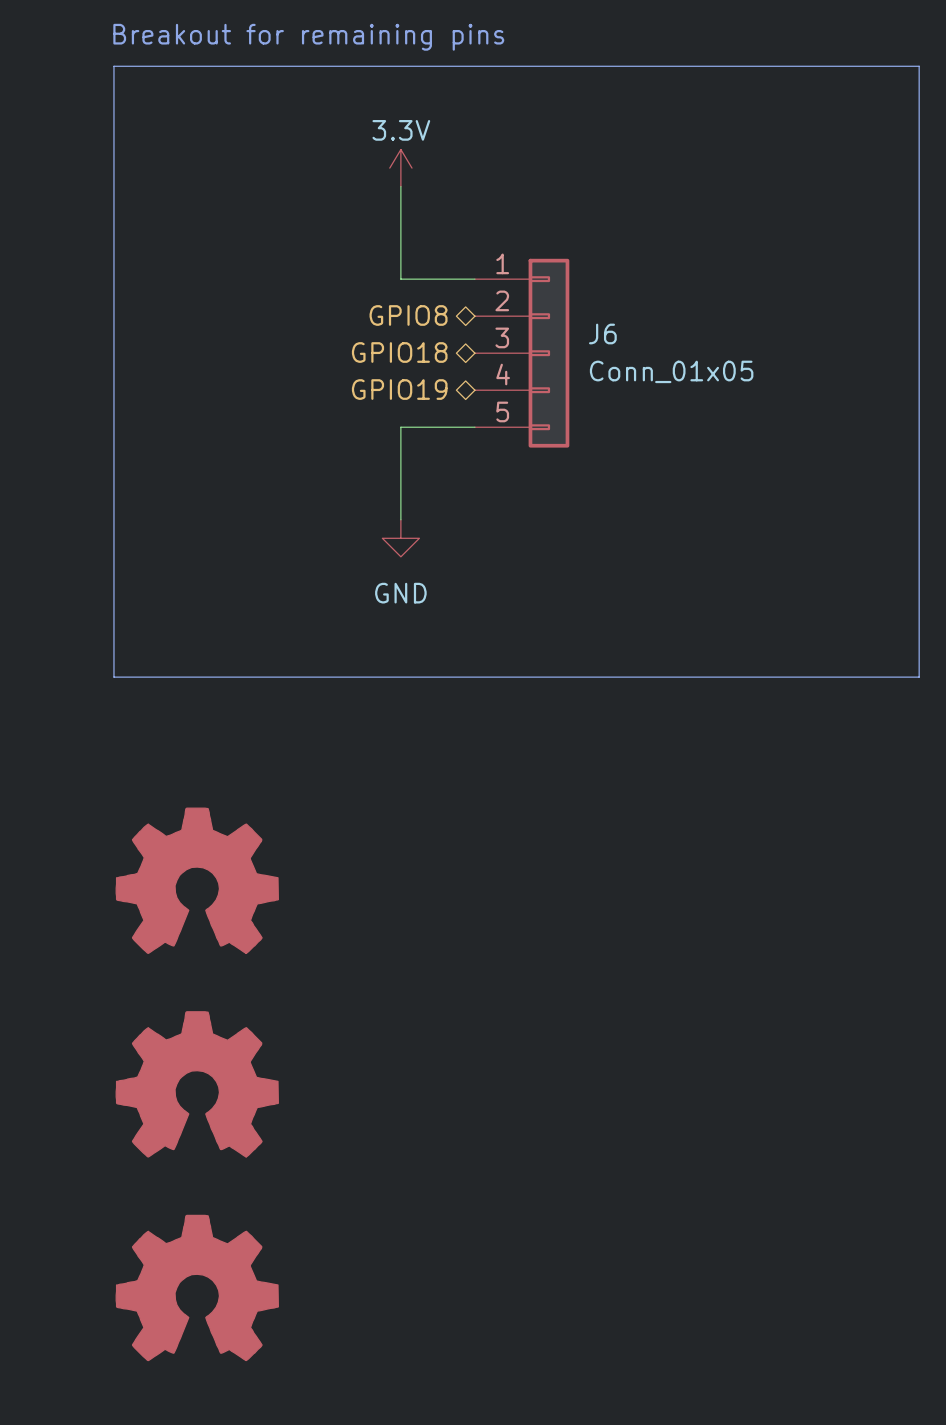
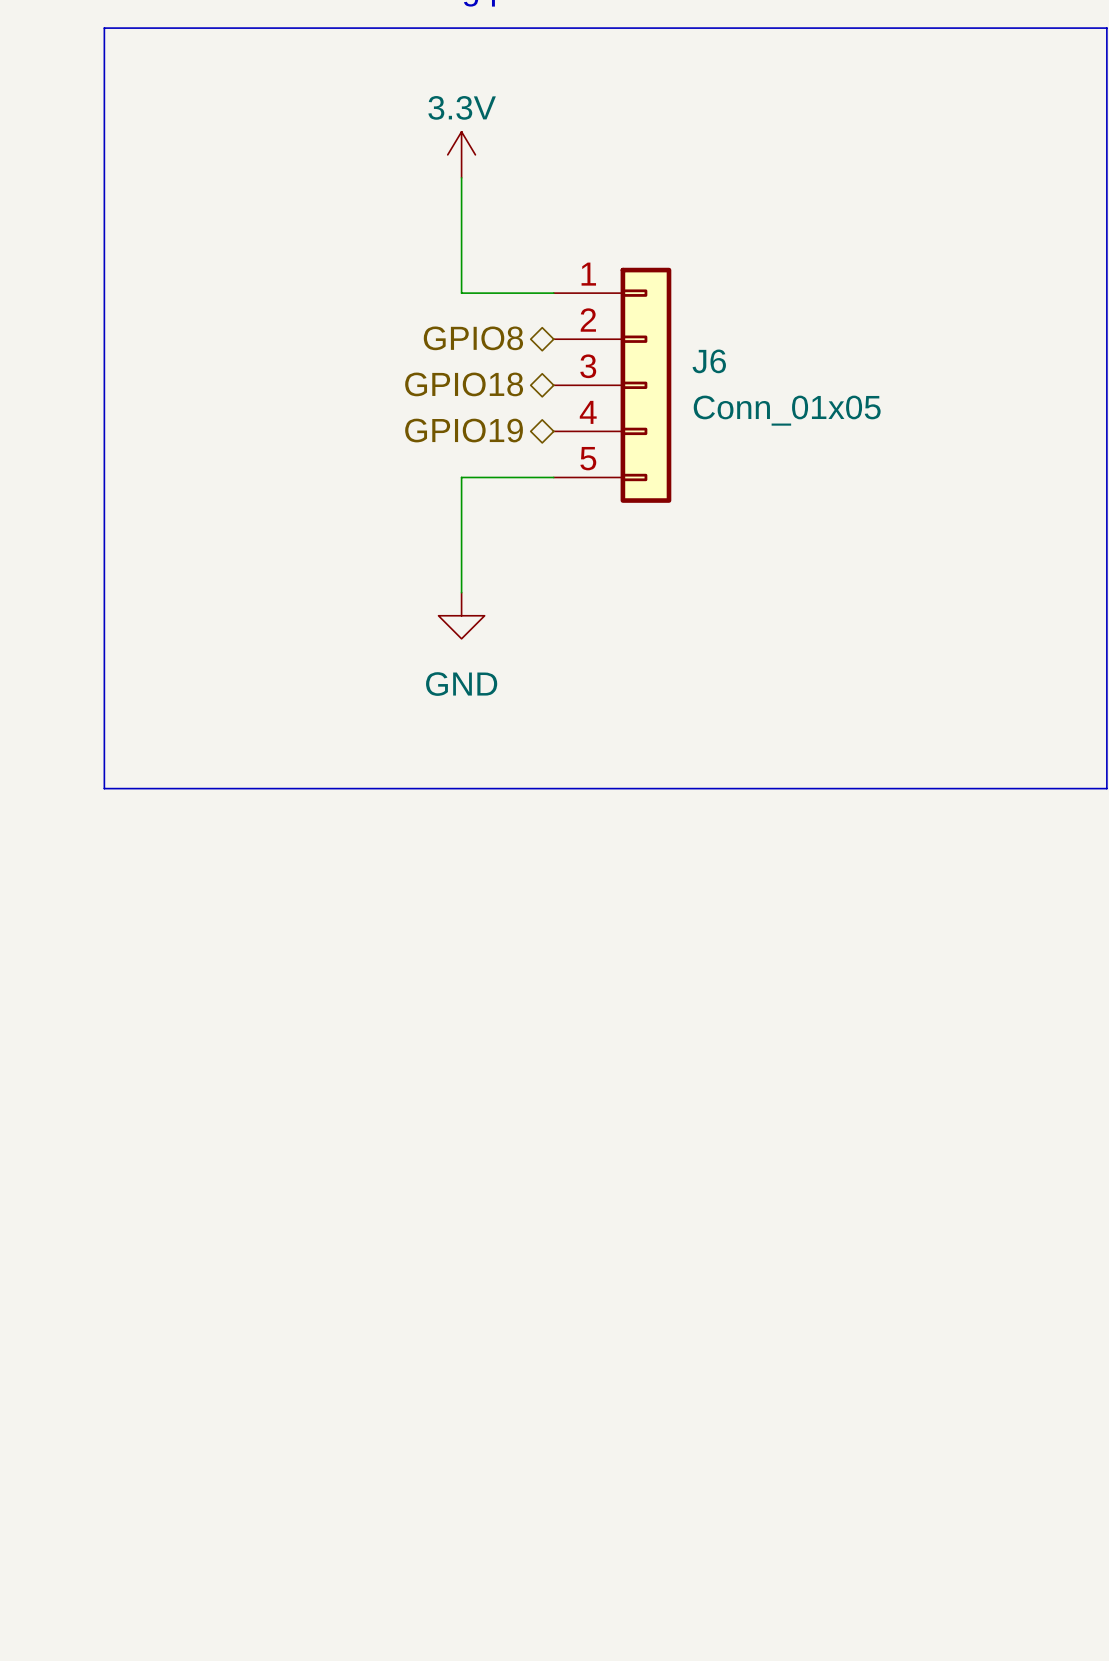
power symbol: (197, 880) -> none
power symbol: (197, 1084) -> none
power symbol: (197, 1287) -> none

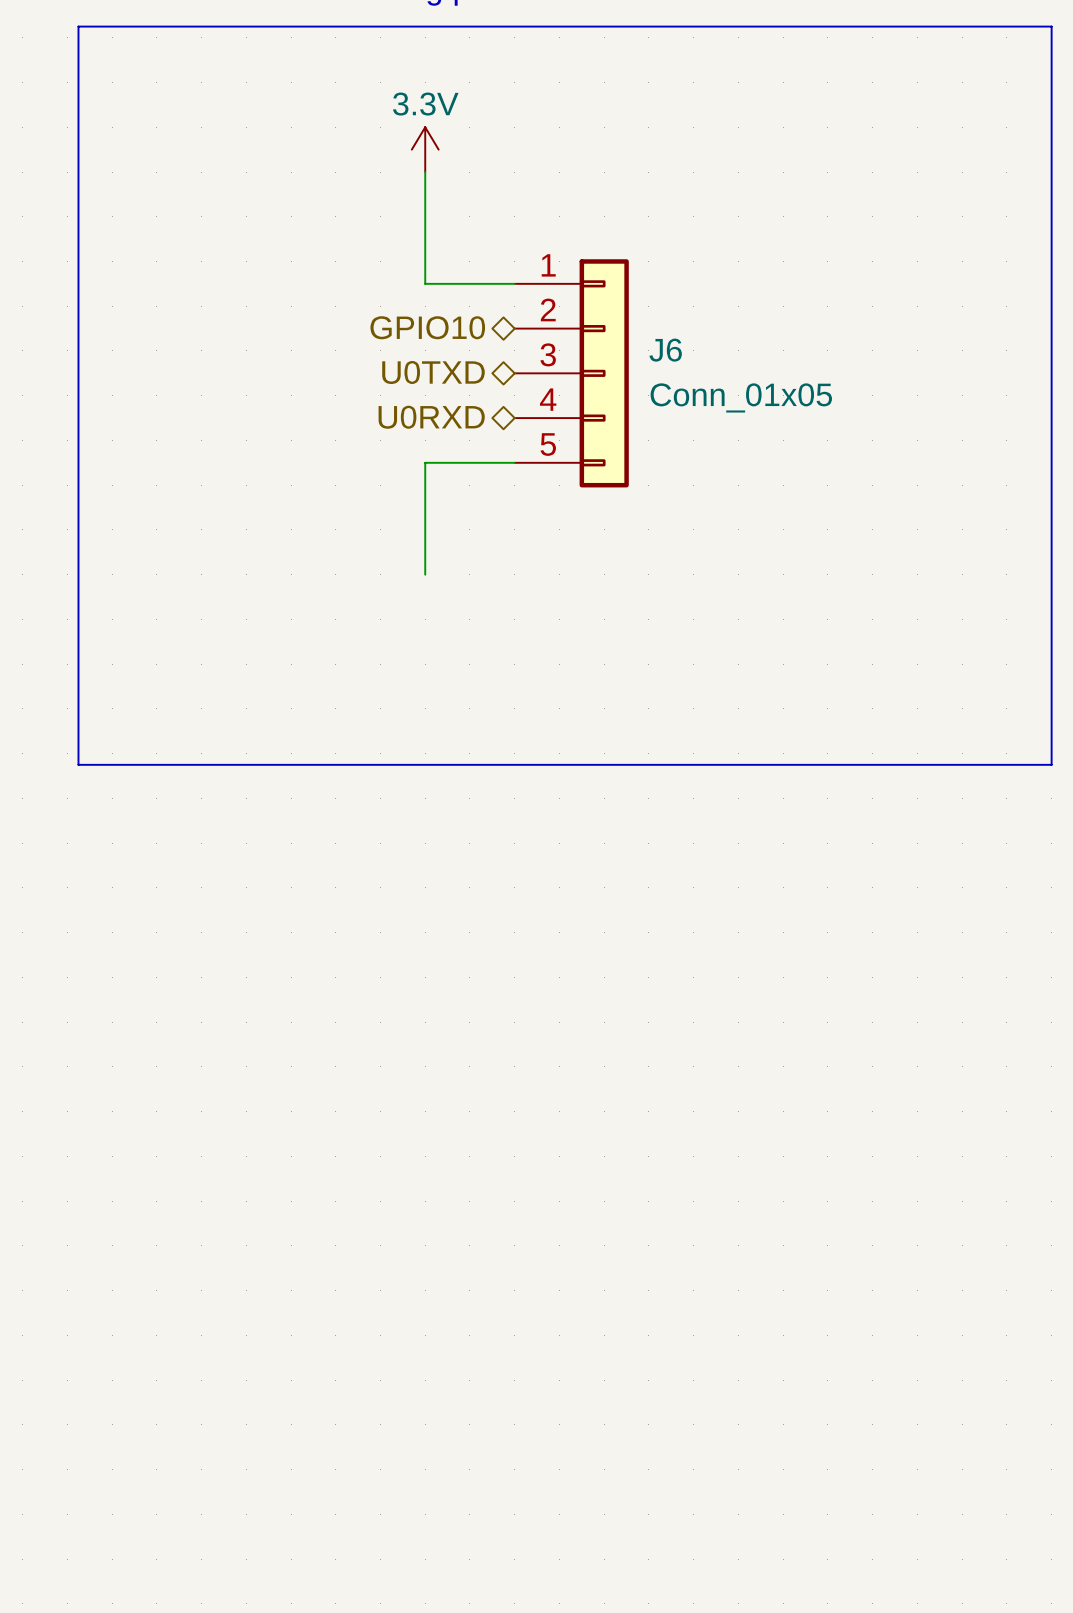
hierarchical label: GPIO8 (473, 338) -> GPIO10 (427, 327)
hierarchical label: GPIO18 (464, 384) -> U0TXD (433, 372)
hierarchical label: GPIO19 (464, 430) -> U0RXD (431, 417)
power symbol: GND (461, 615) -> none

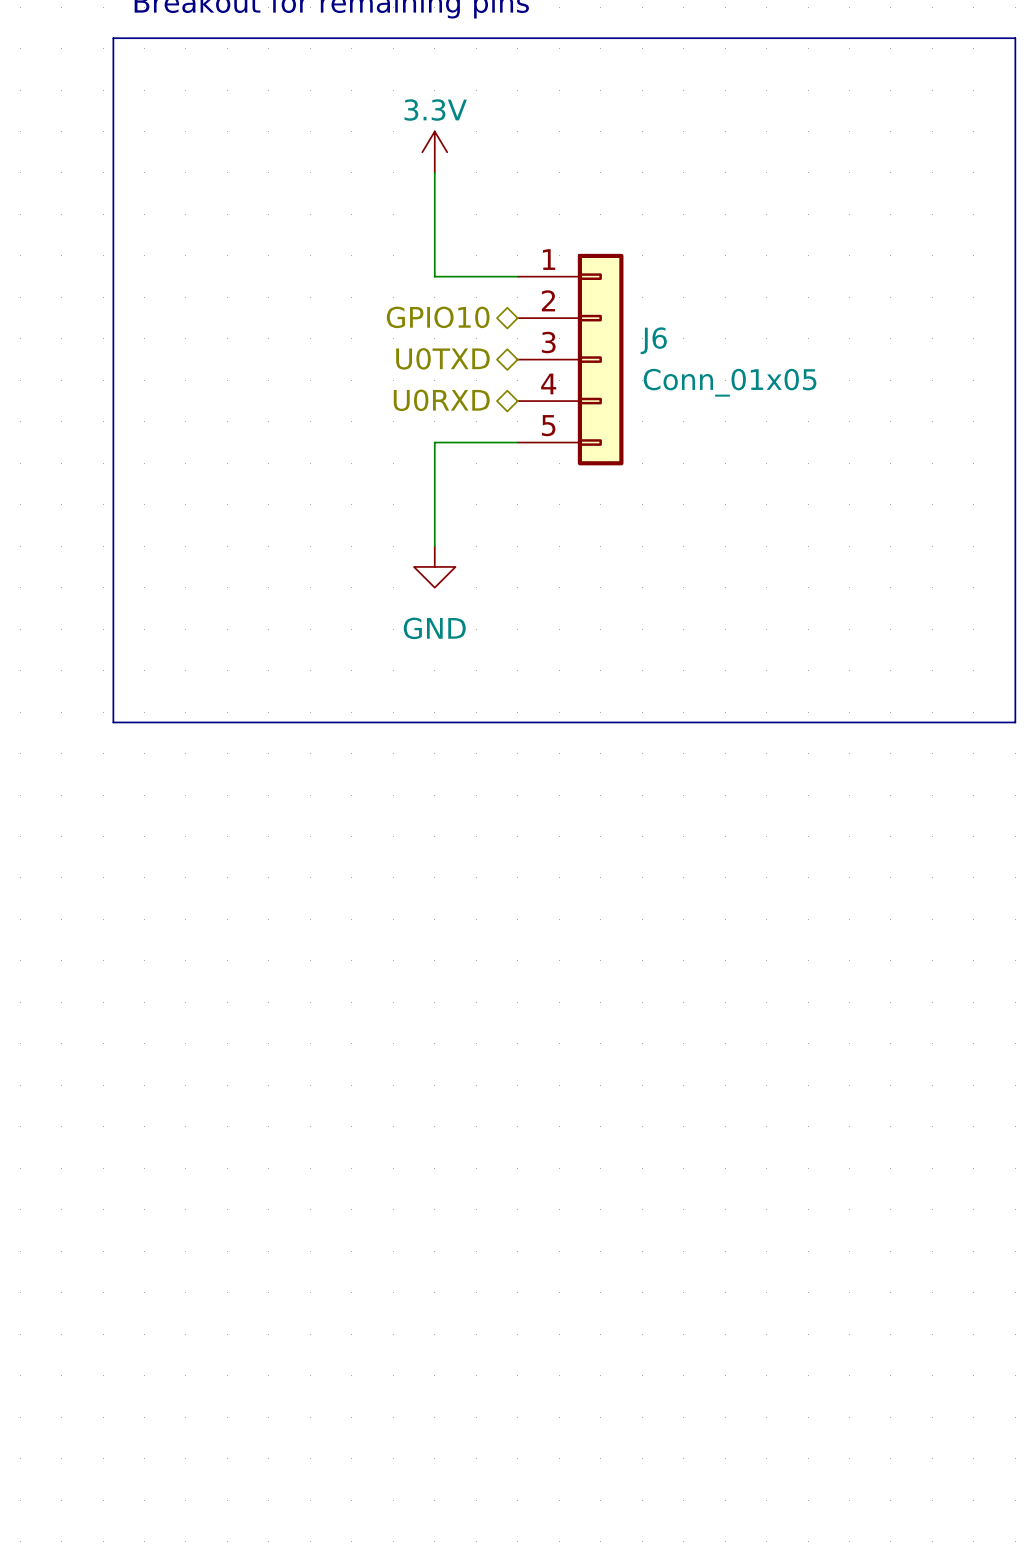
power symbol: none -> GND (434, 566)

